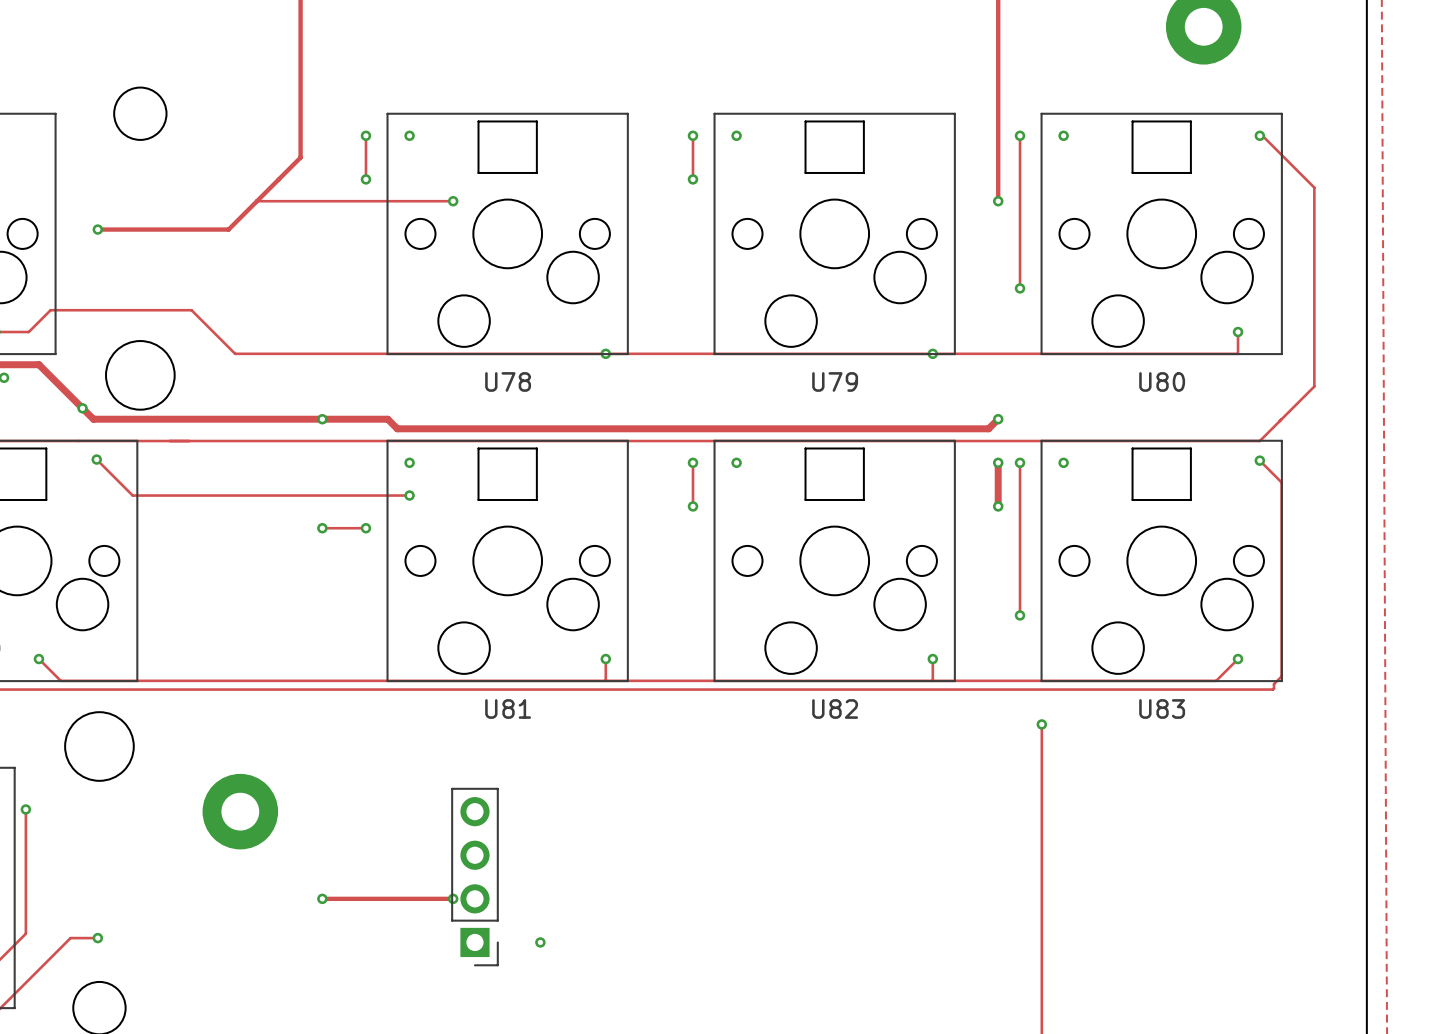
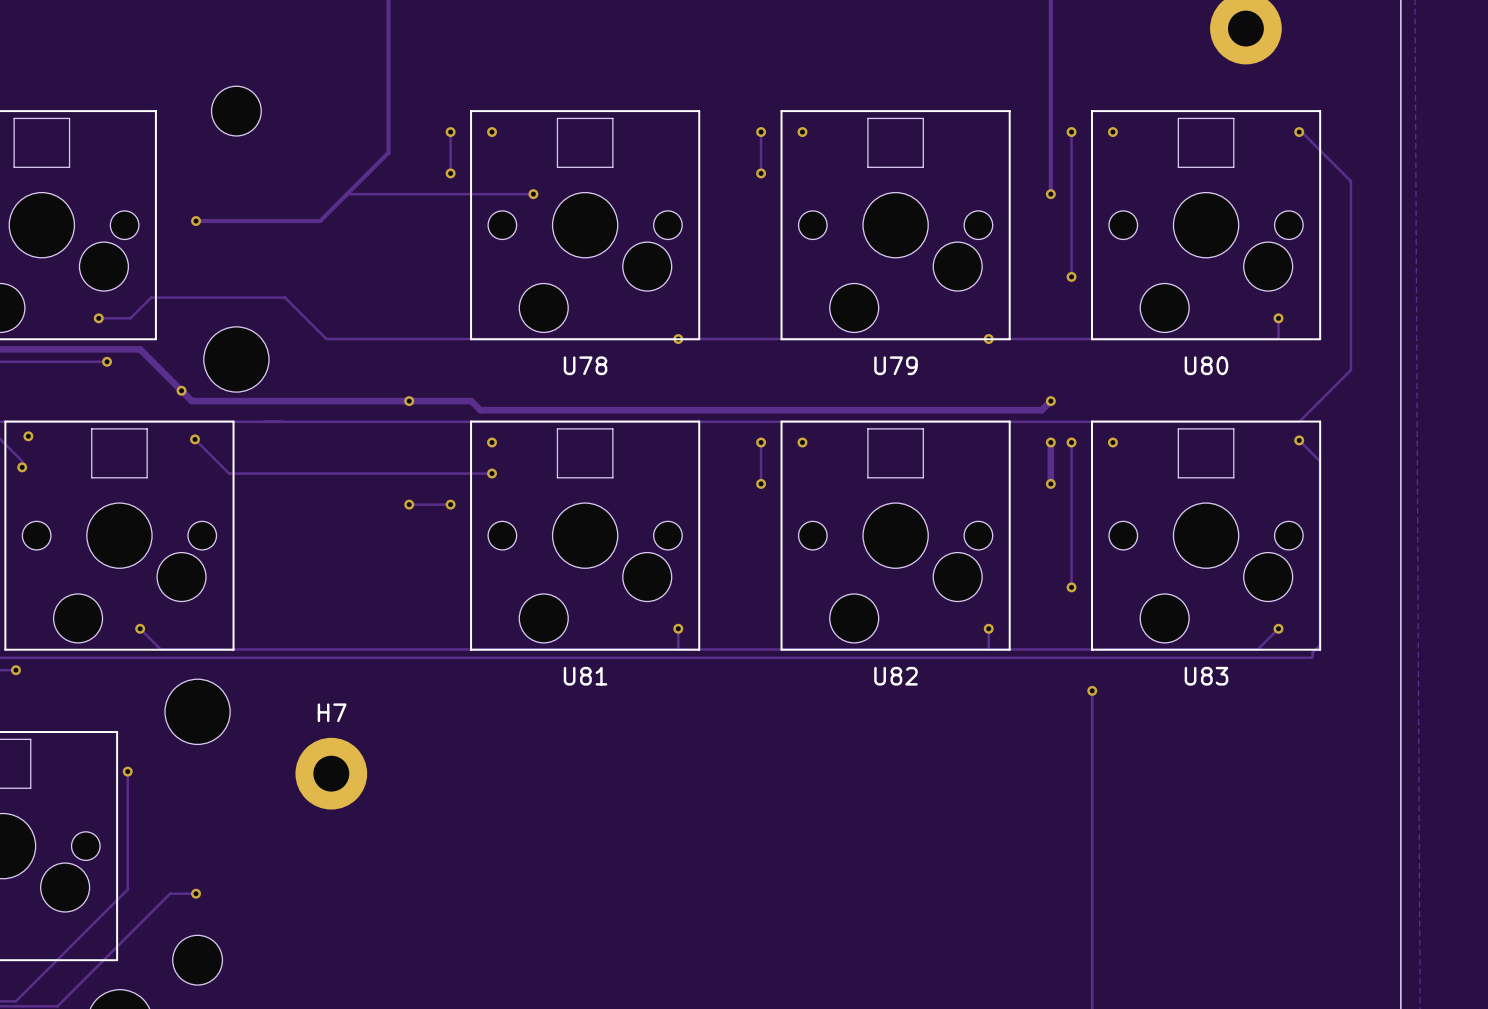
H7 name: none -> H7 (332, 712)
part: (474, 877) -> none
track: (322, 898) (453, 898) -> none
via: (322, 898) -> none
via: (453, 898) -> none
via: (540, 942) -> none

